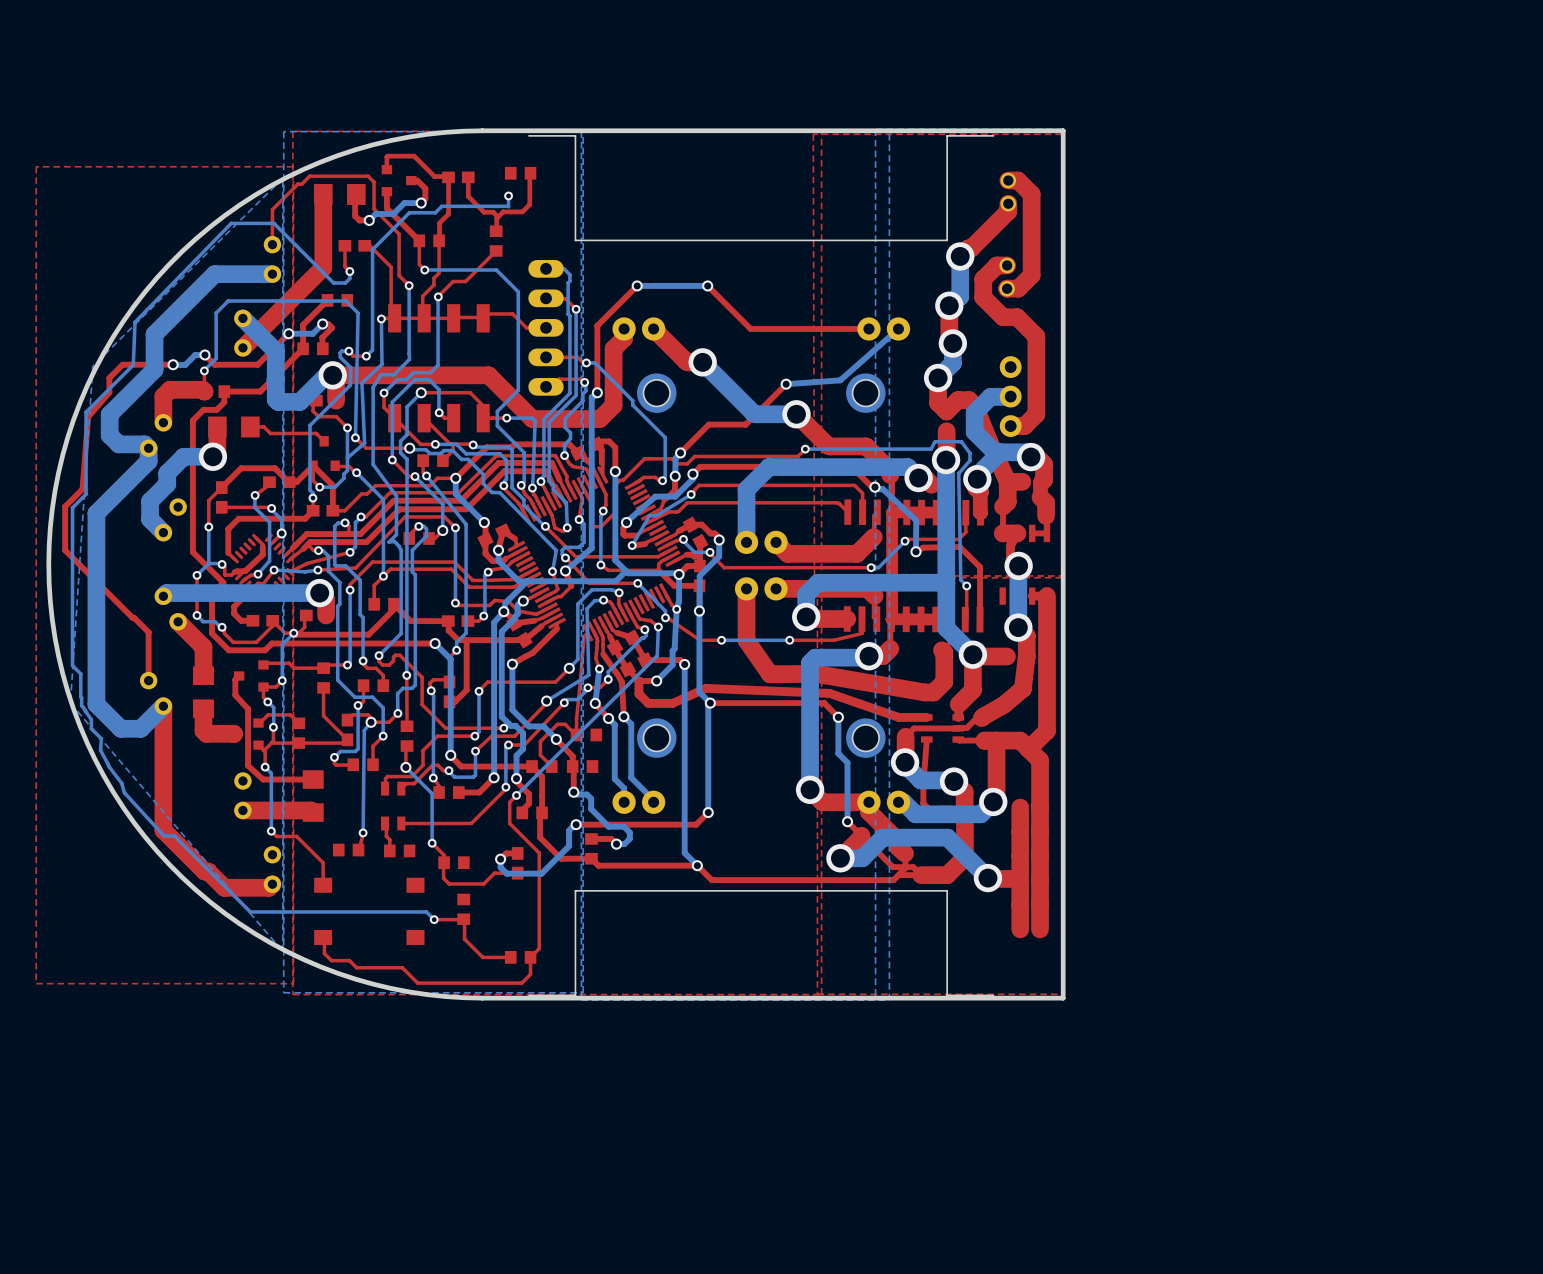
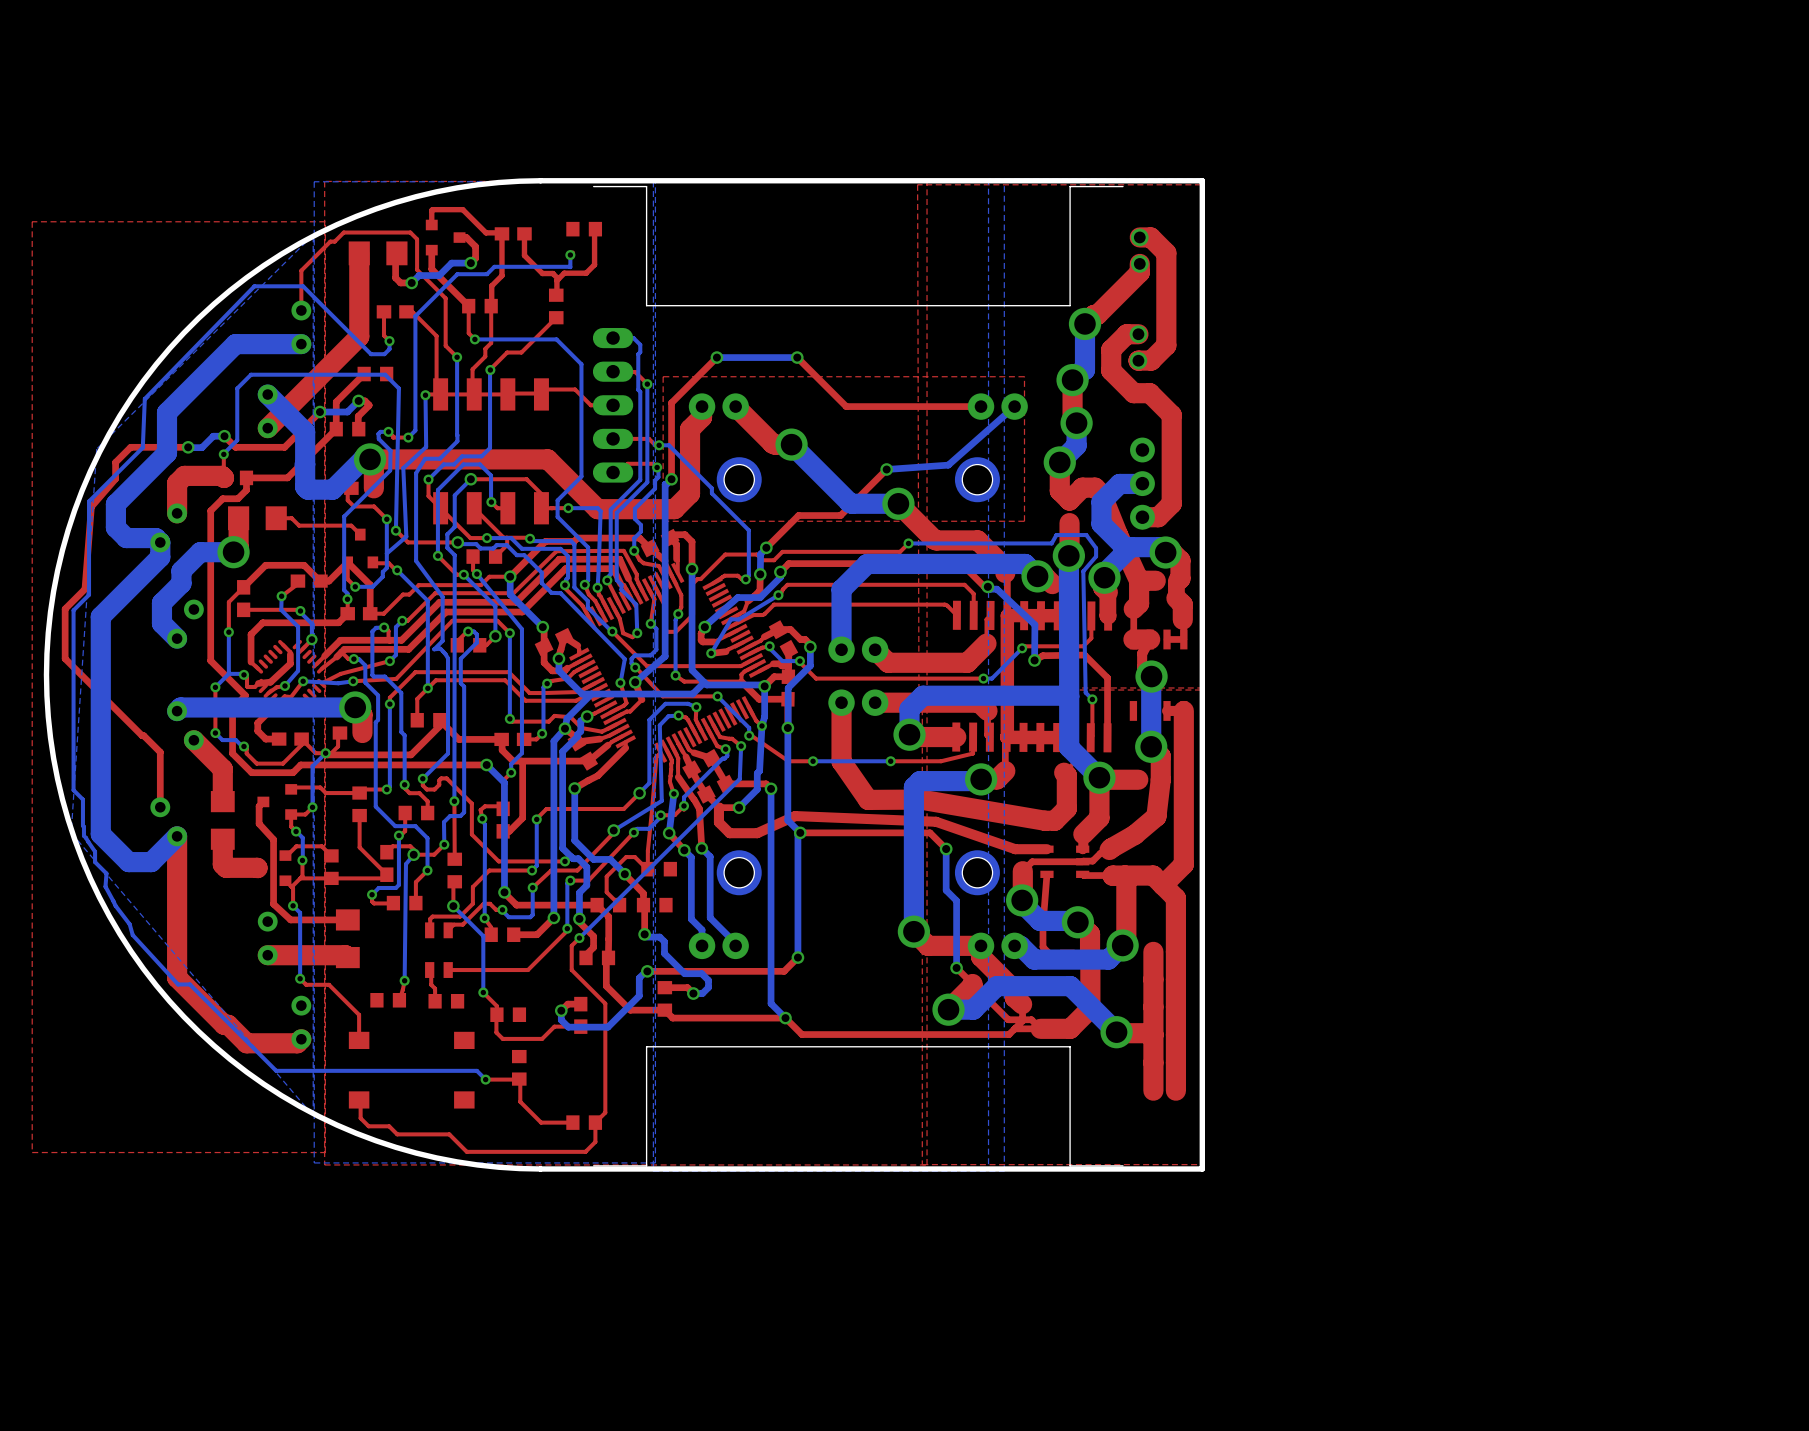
top zone outline: none -> (1024, 376) (663, 376) (663, 521) (1024, 521) (1024, 376)

